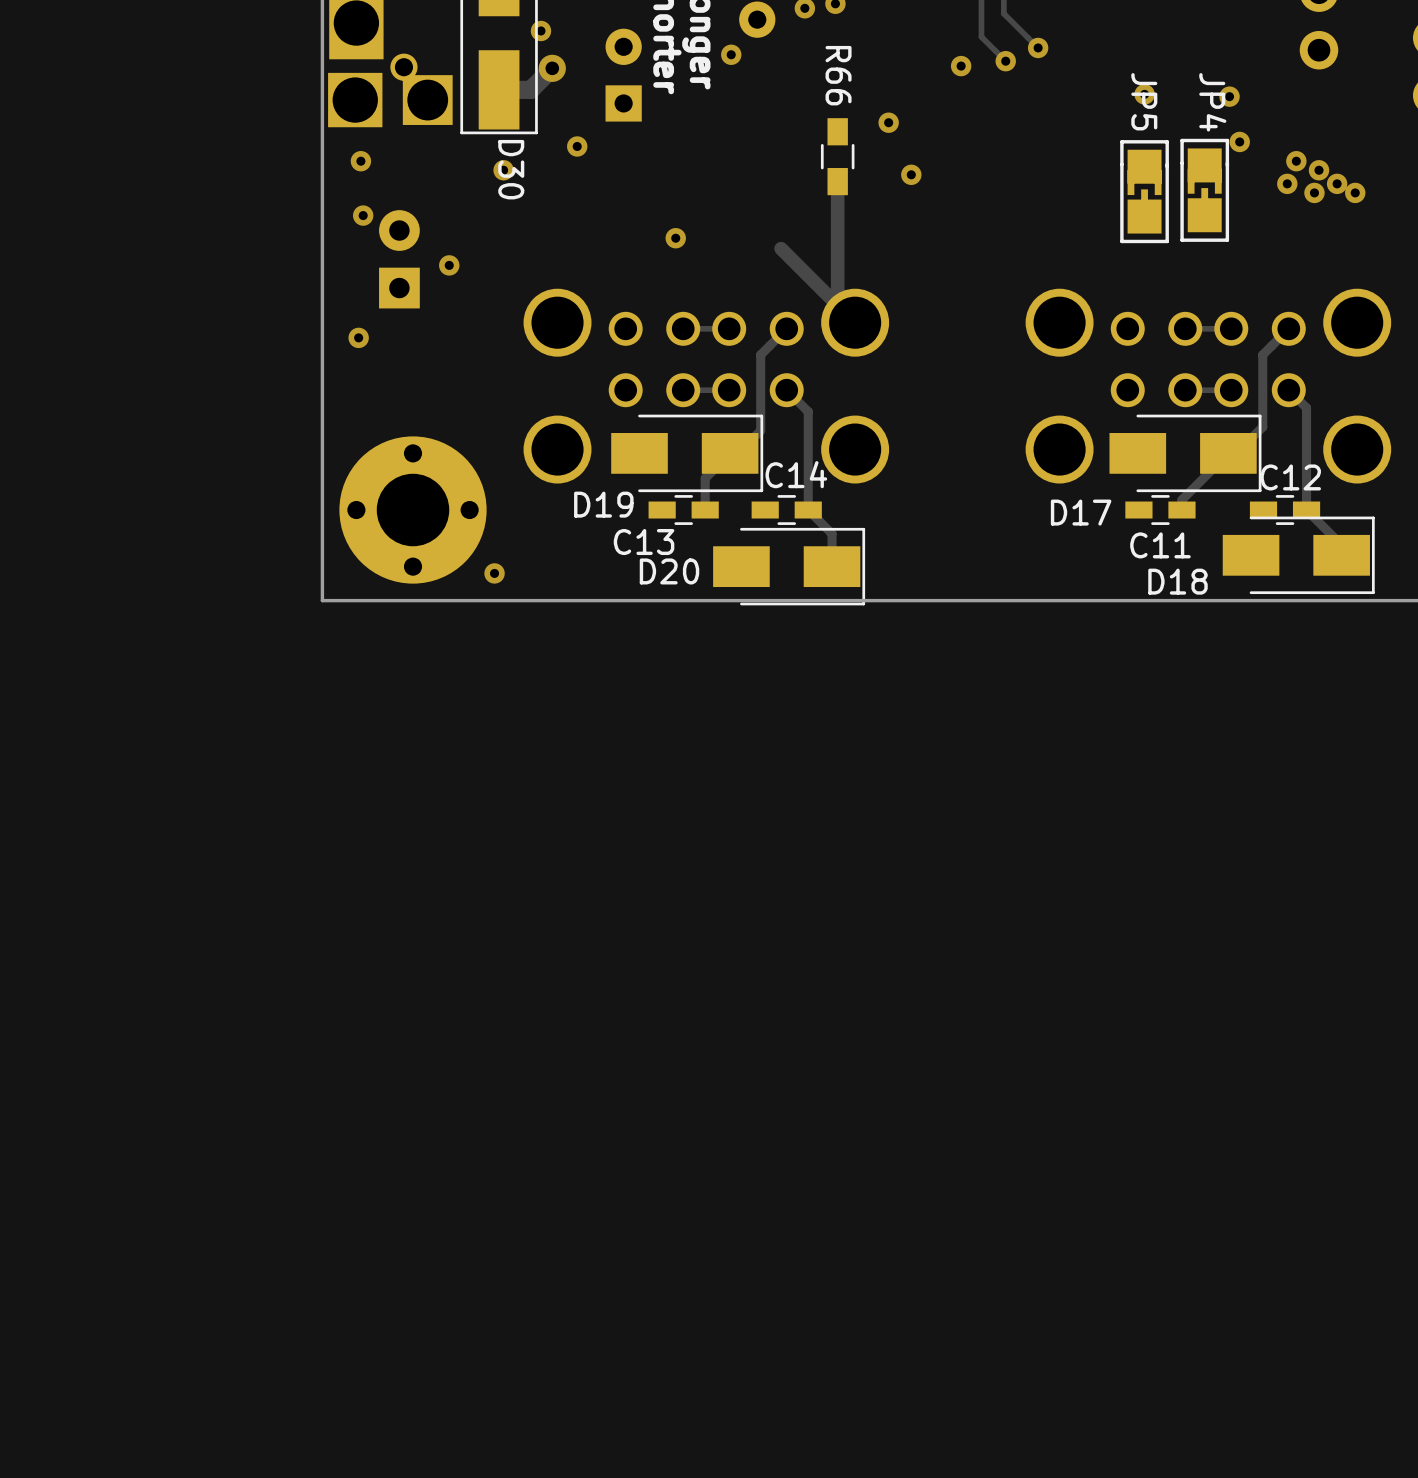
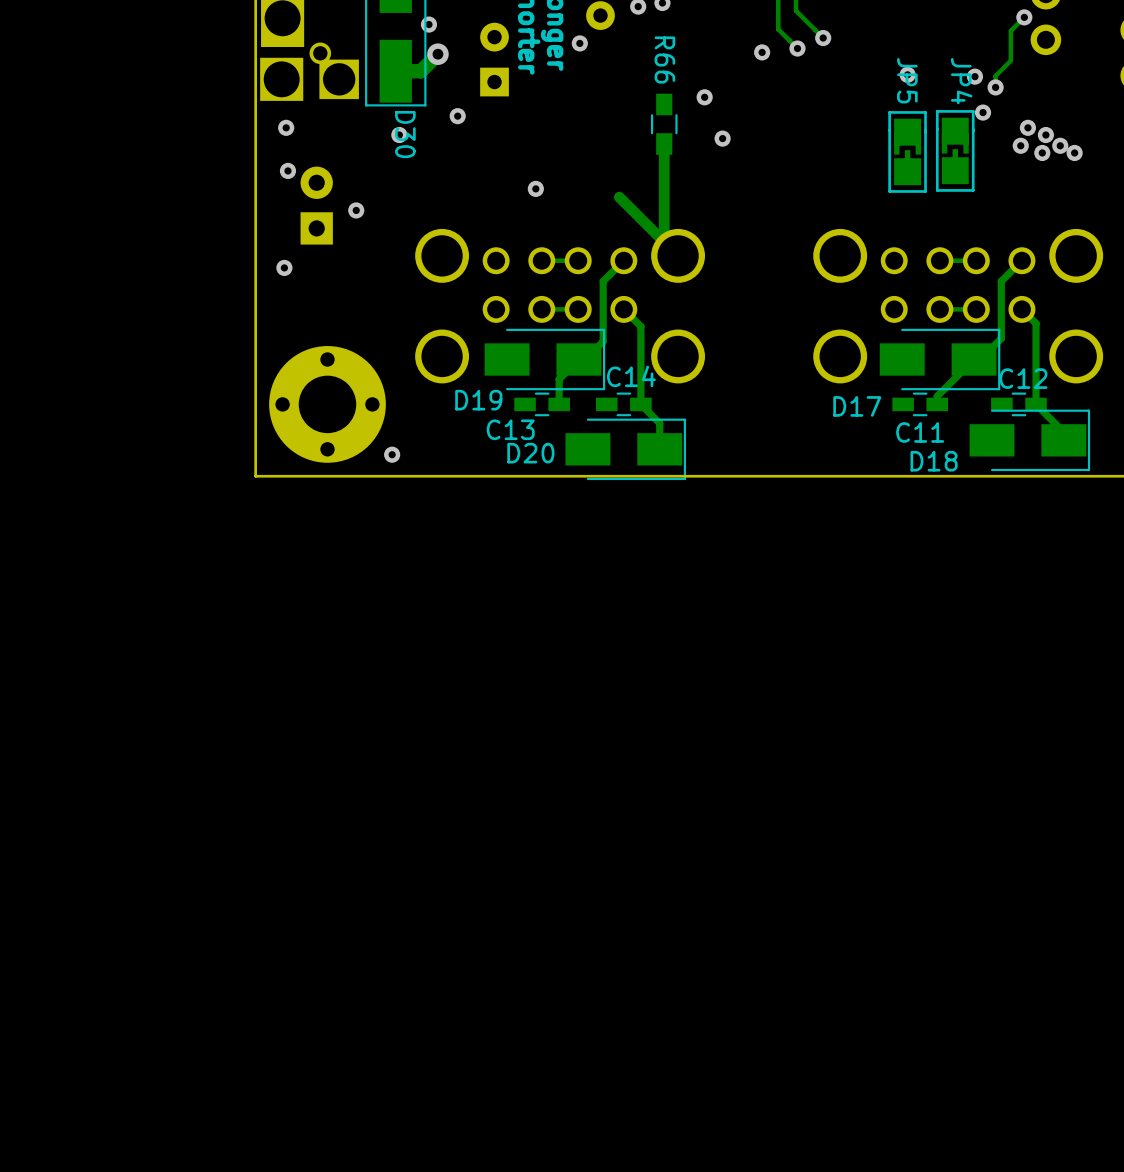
track: none -> (1024, 17) (1010, 30) (1010, 60) (995, 75) (995, 87)
via: none -> (1024, 17)
via: none -> (995, 87)

